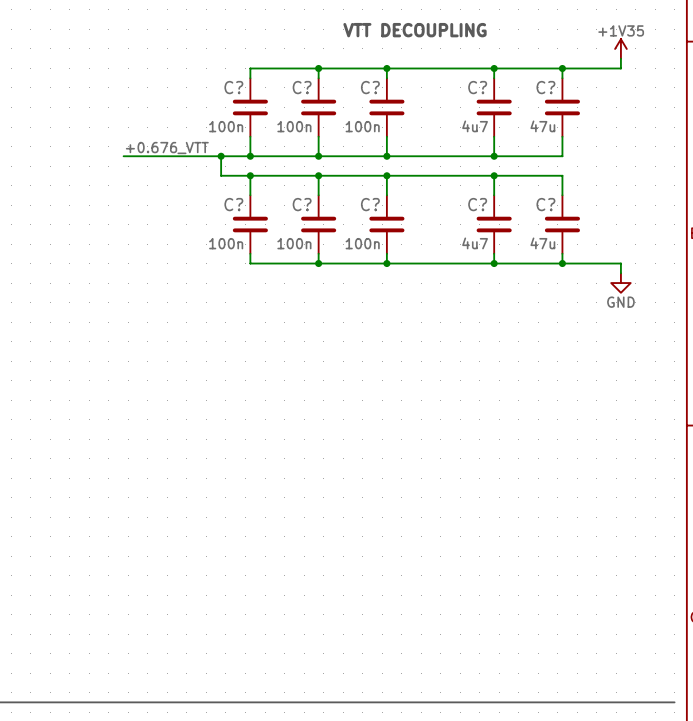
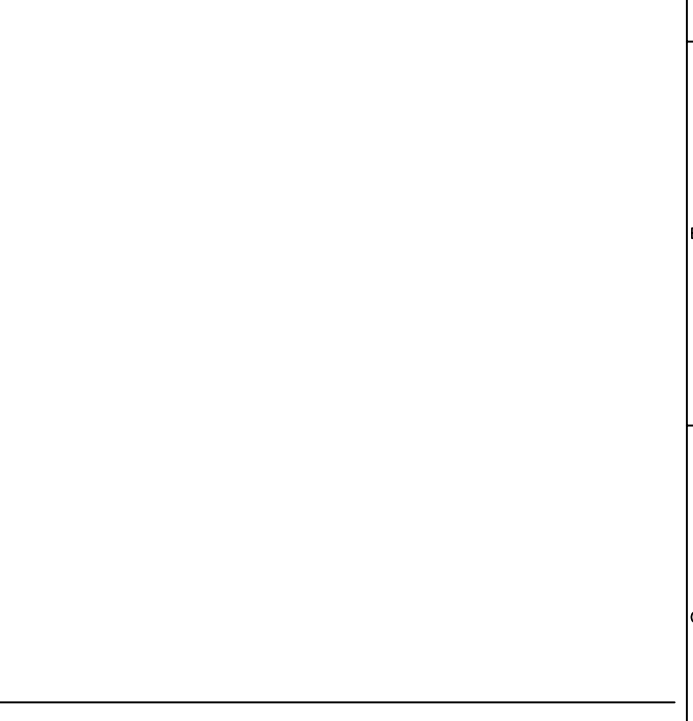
text: VTT DECOUPLING (415, 30) -> none
power symbol: +1V35 (620, 48) -> none
wire: (620, 58) (620, 68) (250, 68) (250, 78) -> none
wire: (318, 68) (318, 78) -> none
junction: (318, 68) -> none
wire: (386, 68) (386, 78) -> none
junction: (386, 68) -> none
wire: (494, 68) (494, 78) -> none
junction: (494, 68) -> none
wire: (562, 68) (562, 78) -> none
junction: (562, 68) -> none
C?: (250, 107) -> none
C?: (318, 107) -> none
C?: (386, 107) -> none
C?: (494, 107) -> none
C?: (562, 107) -> none
wire: (250, 136) (250, 156) -> none
wire: (318, 136) (318, 156) -> none
wire: (386, 136) (386, 156) -> none
wire: (494, 136) (494, 156) -> none
wire: (562, 136) (562, 156) (123, 156) -> none
label: +0.676_VTT (167, 148) -> none
wire: (221, 156) (221, 175) (562, 175) (562, 195) -> none
junction: (221, 156) -> none
junction: (250, 156) -> none
junction: (318, 156) -> none
junction: (386, 156) -> none
junction: (494, 156) -> none
wire: (250, 175) (250, 195) -> none
junction: (250, 175) -> none
wire: (318, 175) (318, 195) -> none
junction: (318, 175) -> none
wire: (386, 175) (386, 195) -> none
junction: (386, 175) -> none
wire: (494, 175) (494, 195) -> none
junction: (494, 175) -> none
C?: (250, 224) -> none
C?: (318, 224) -> none
C?: (386, 224) -> none
C?: (494, 224) -> none
C?: (562, 224) -> none
wire: (250, 253) (250, 263) (620, 263) (620, 273) -> none
wire: (318, 253) (318, 263) -> none
wire: (386, 253) (386, 263) -> none
wire: (494, 253) (494, 263) -> none
wire: (562, 253) (562, 263) -> none
junction: (318, 263) -> none
junction: (386, 263) -> none
junction: (494, 263) -> none
junction: (562, 263) -> none
power symbol: GND (620, 283) -> none

